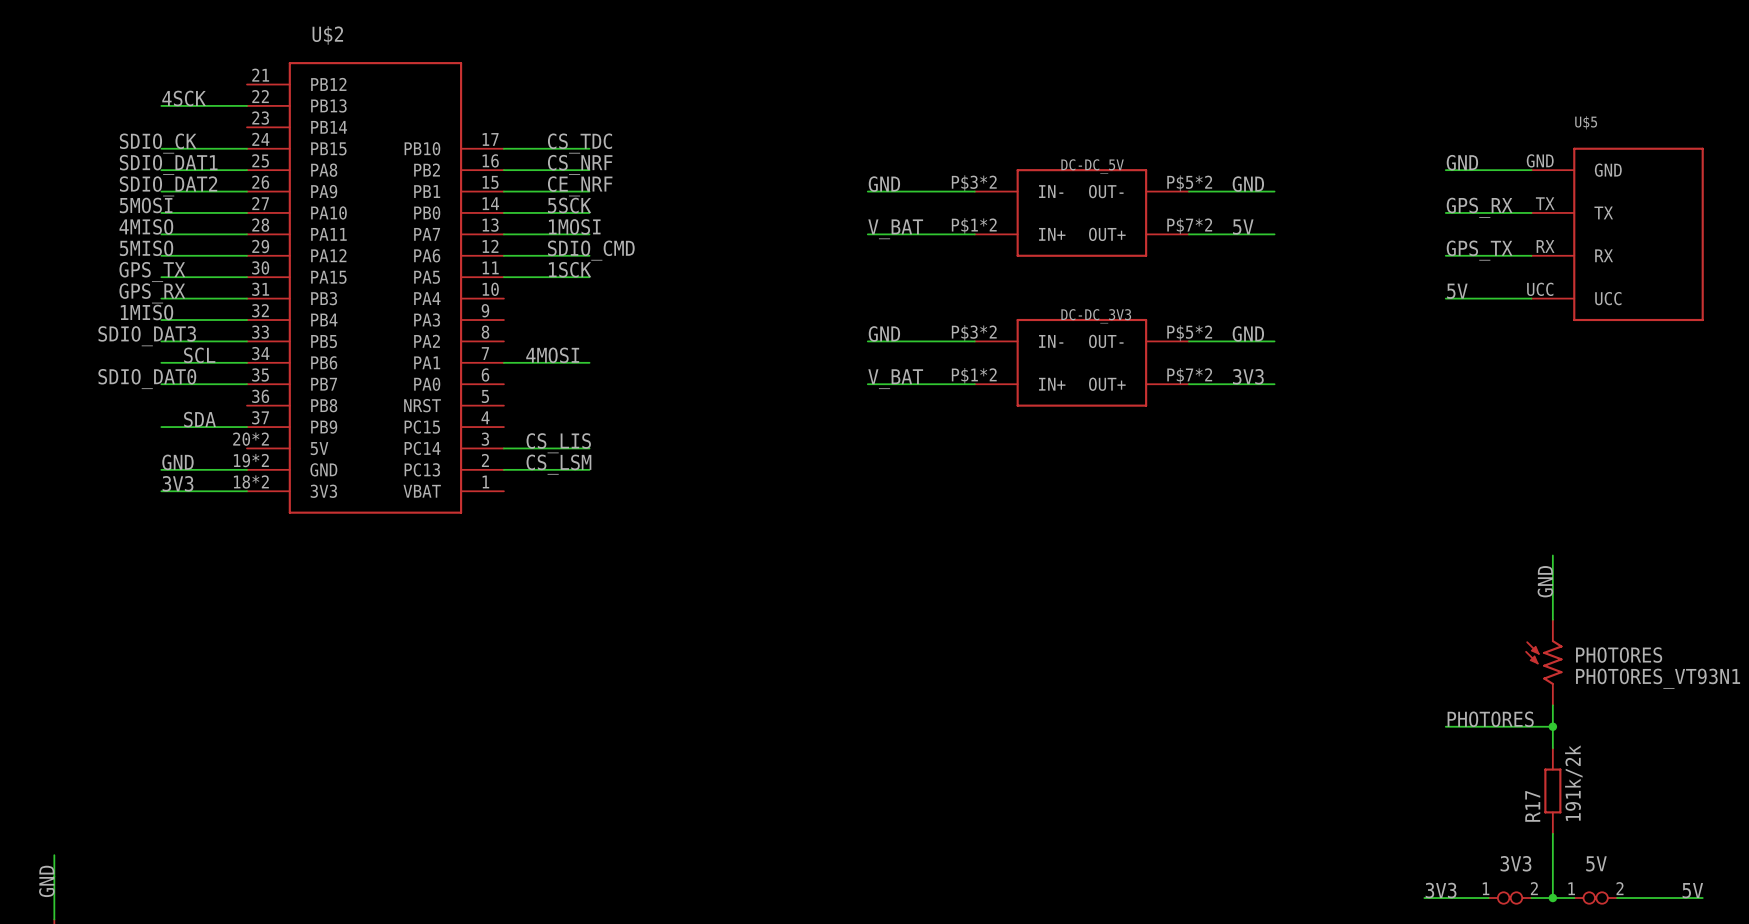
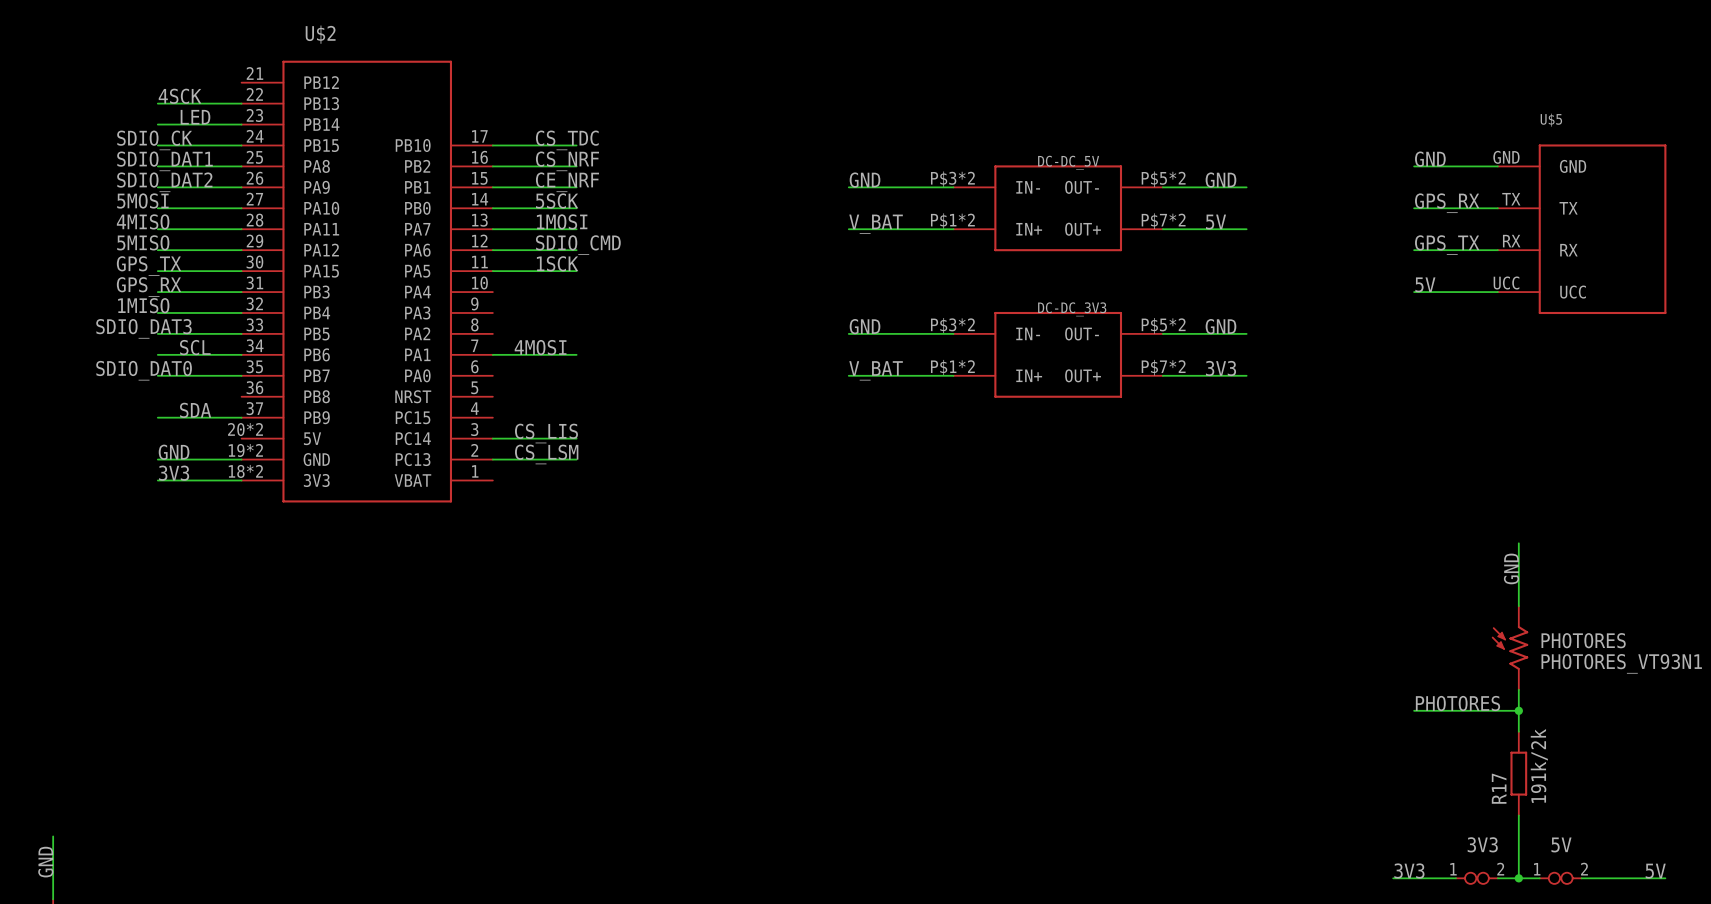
label: none -> LED (195, 117)
wire: none -> (157, 124) (241, 124)

